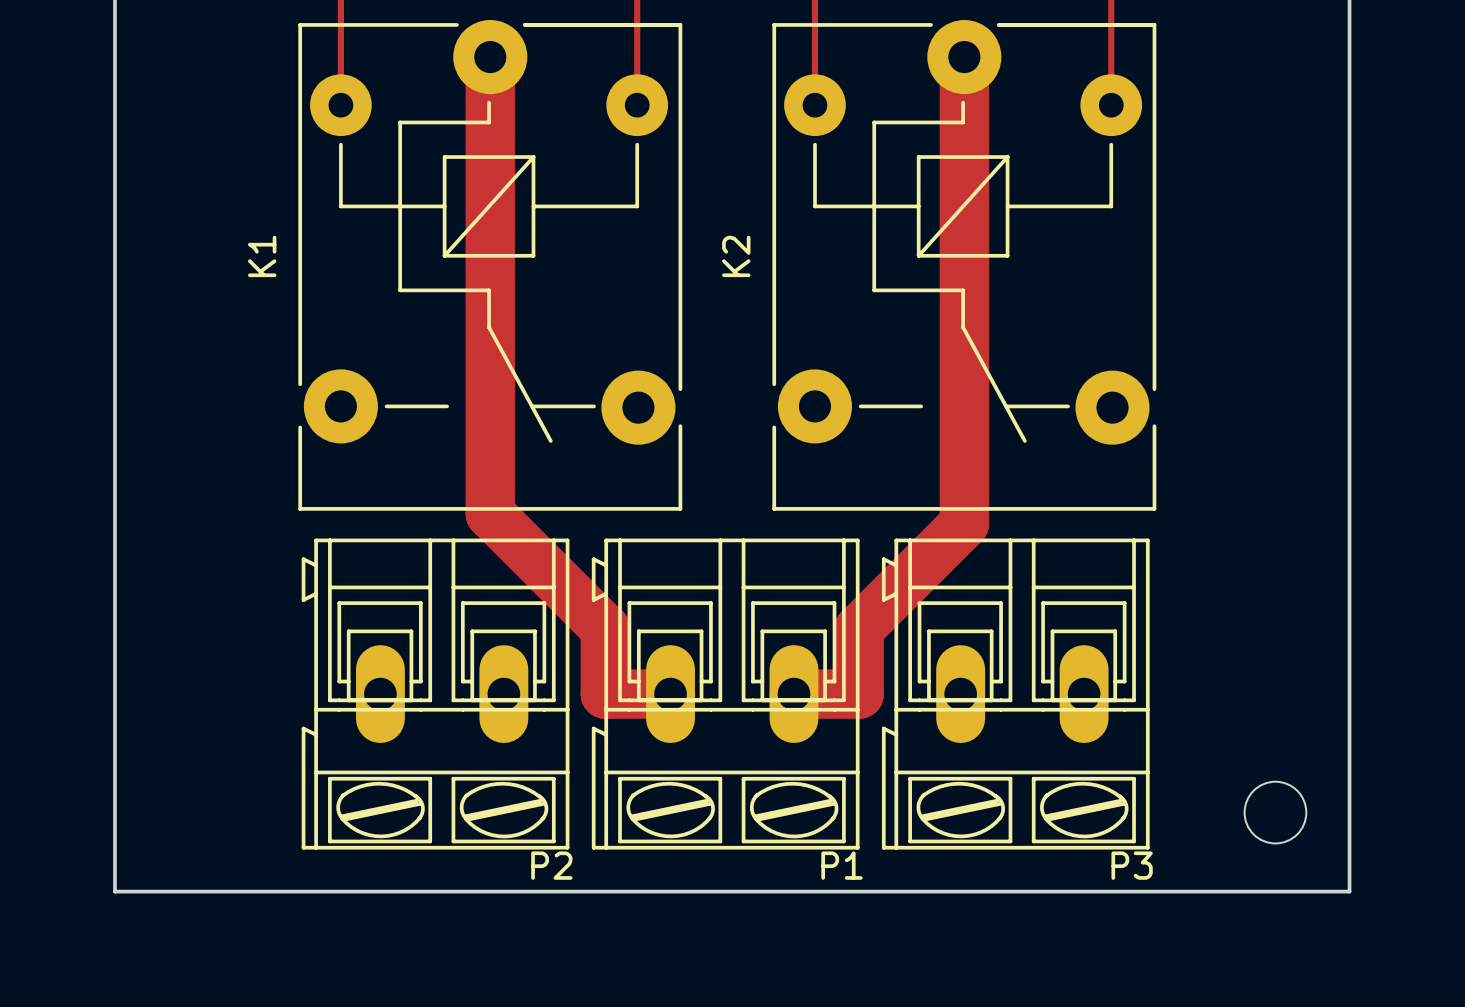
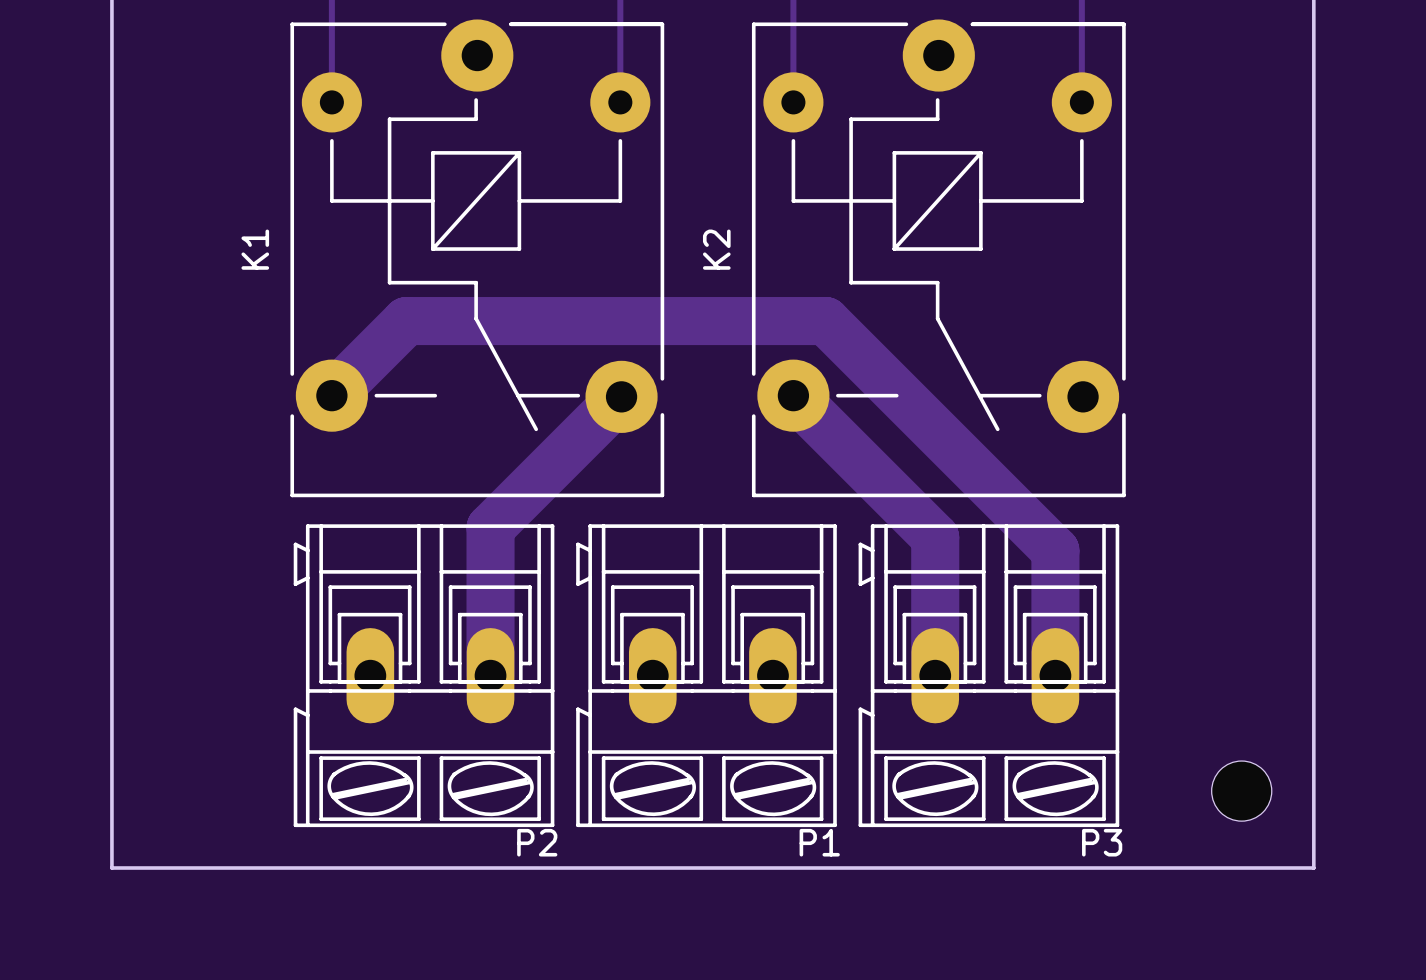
track: (490, 57) (490, 513) (605, 628) (605, 694) (670, 694) -> none
track: (964, 57) (964, 523) (859, 628) (859, 694) (793, 694) -> none
track: none -> (331, 395) (406, 321) (825, 321) (1055, 550) (1055, 675)
track: none -> (793, 395) (935, 537) (935, 675)
track: none -> (621, 396) (490, 527) (490, 675)

